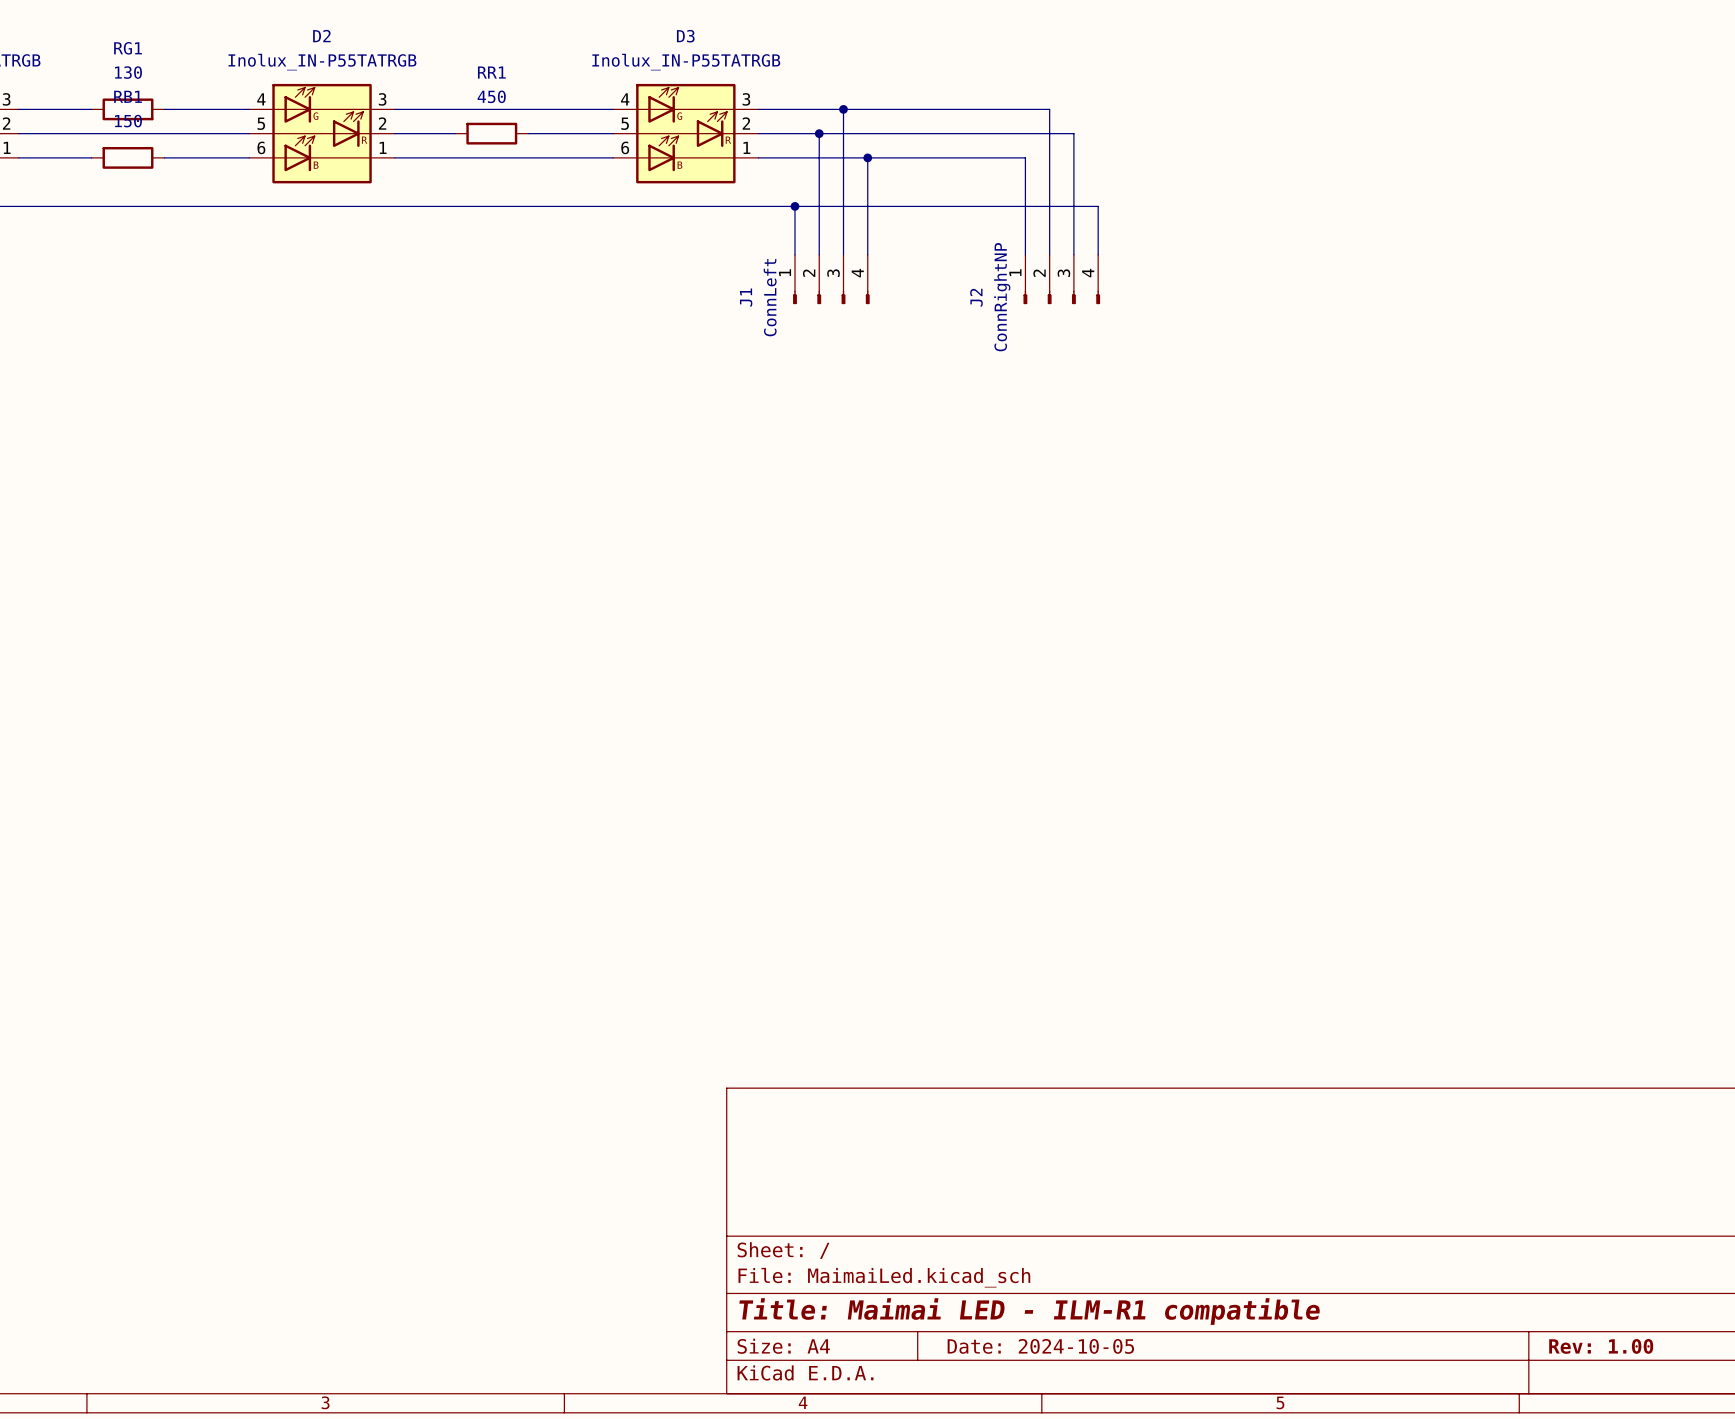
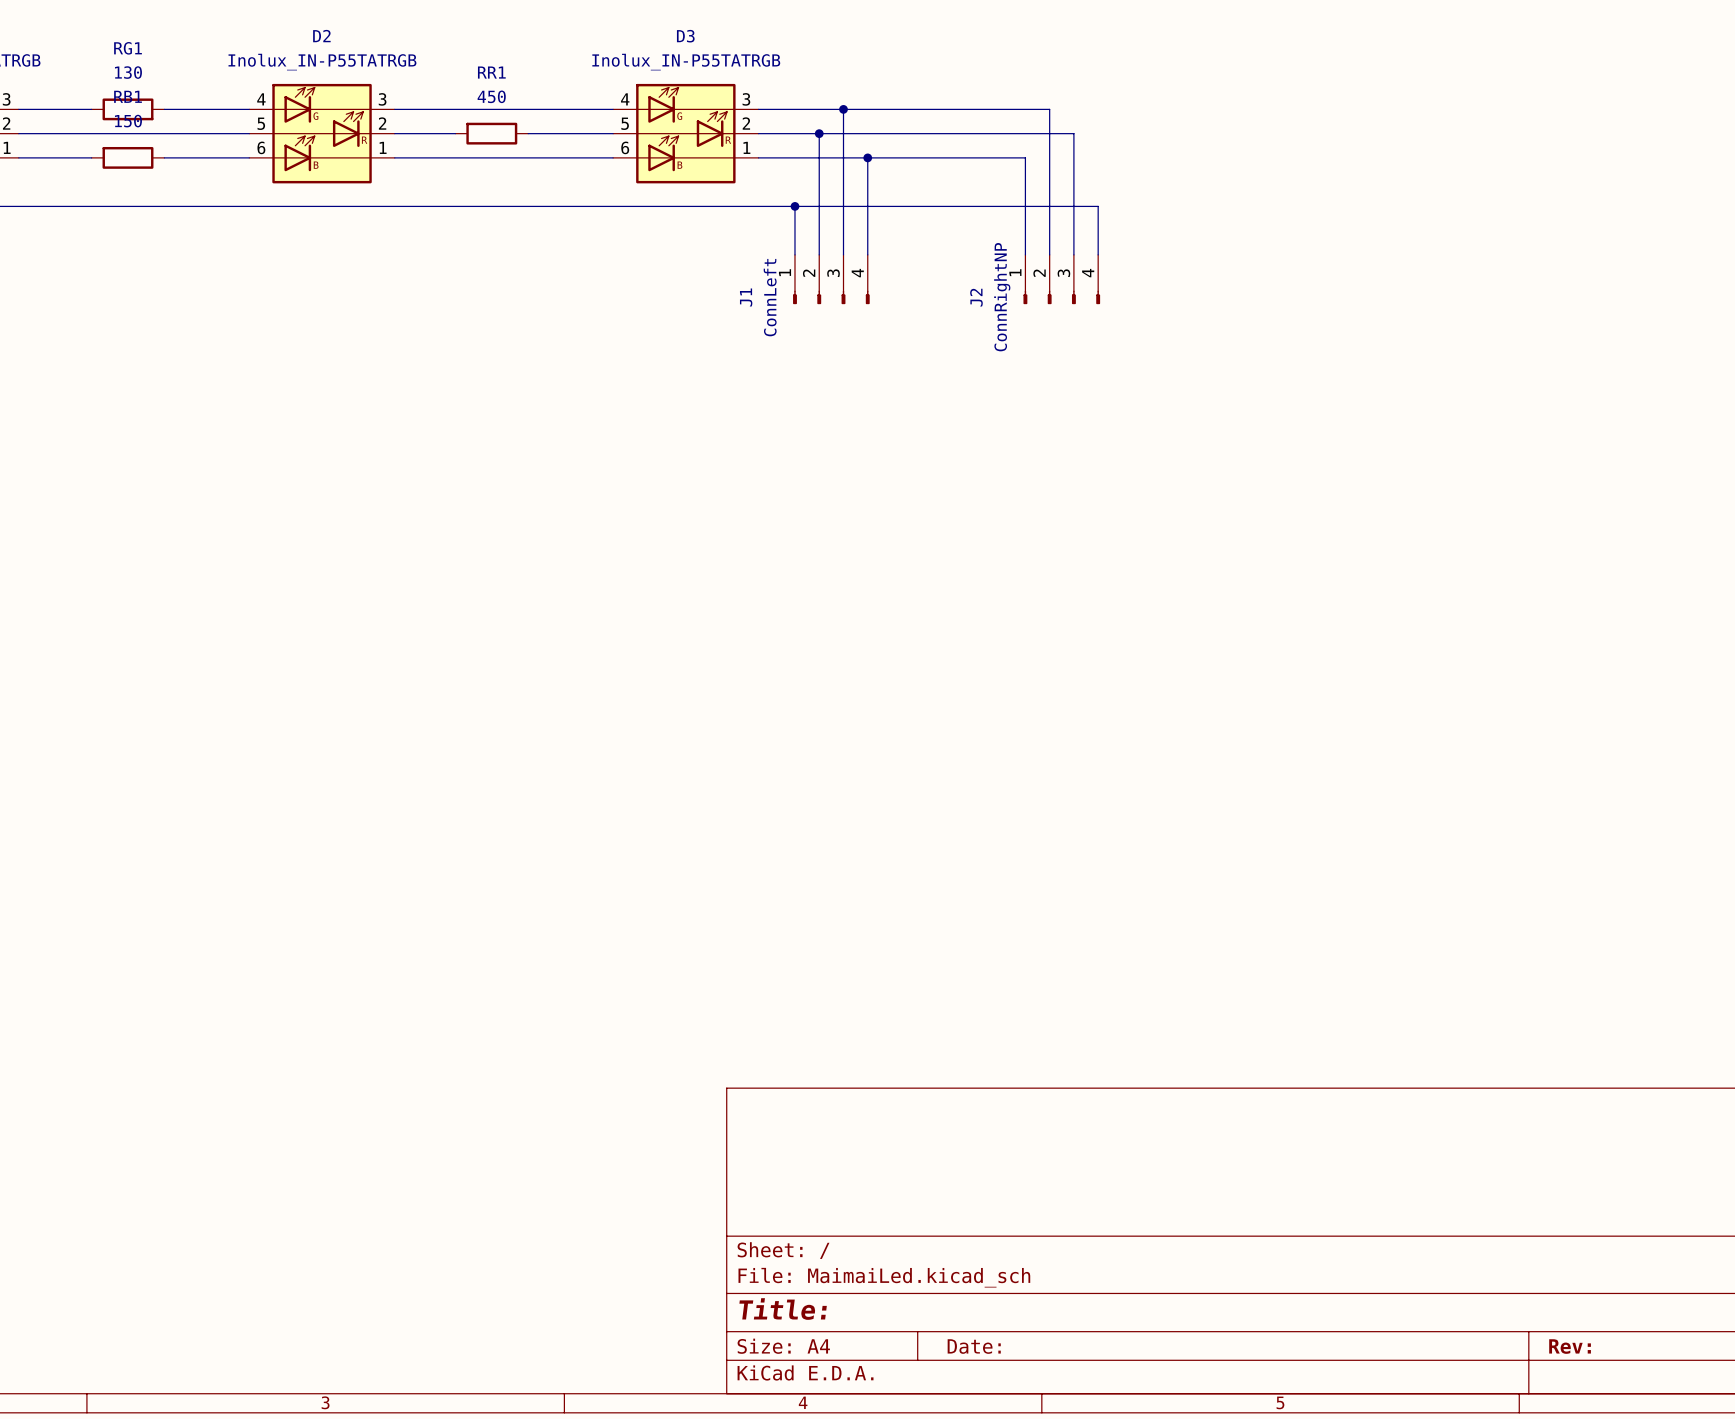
title block: Title: Maimai LED - ILM-R1 compatible (1029, 1311) -> Title: (783, 1309)
title block: Date: 2024-10-05 (1040, 1346) -> Date: (974, 1346)
title block: Rev: 1.00 (1601, 1346) -> Rev: (1570, 1346)

